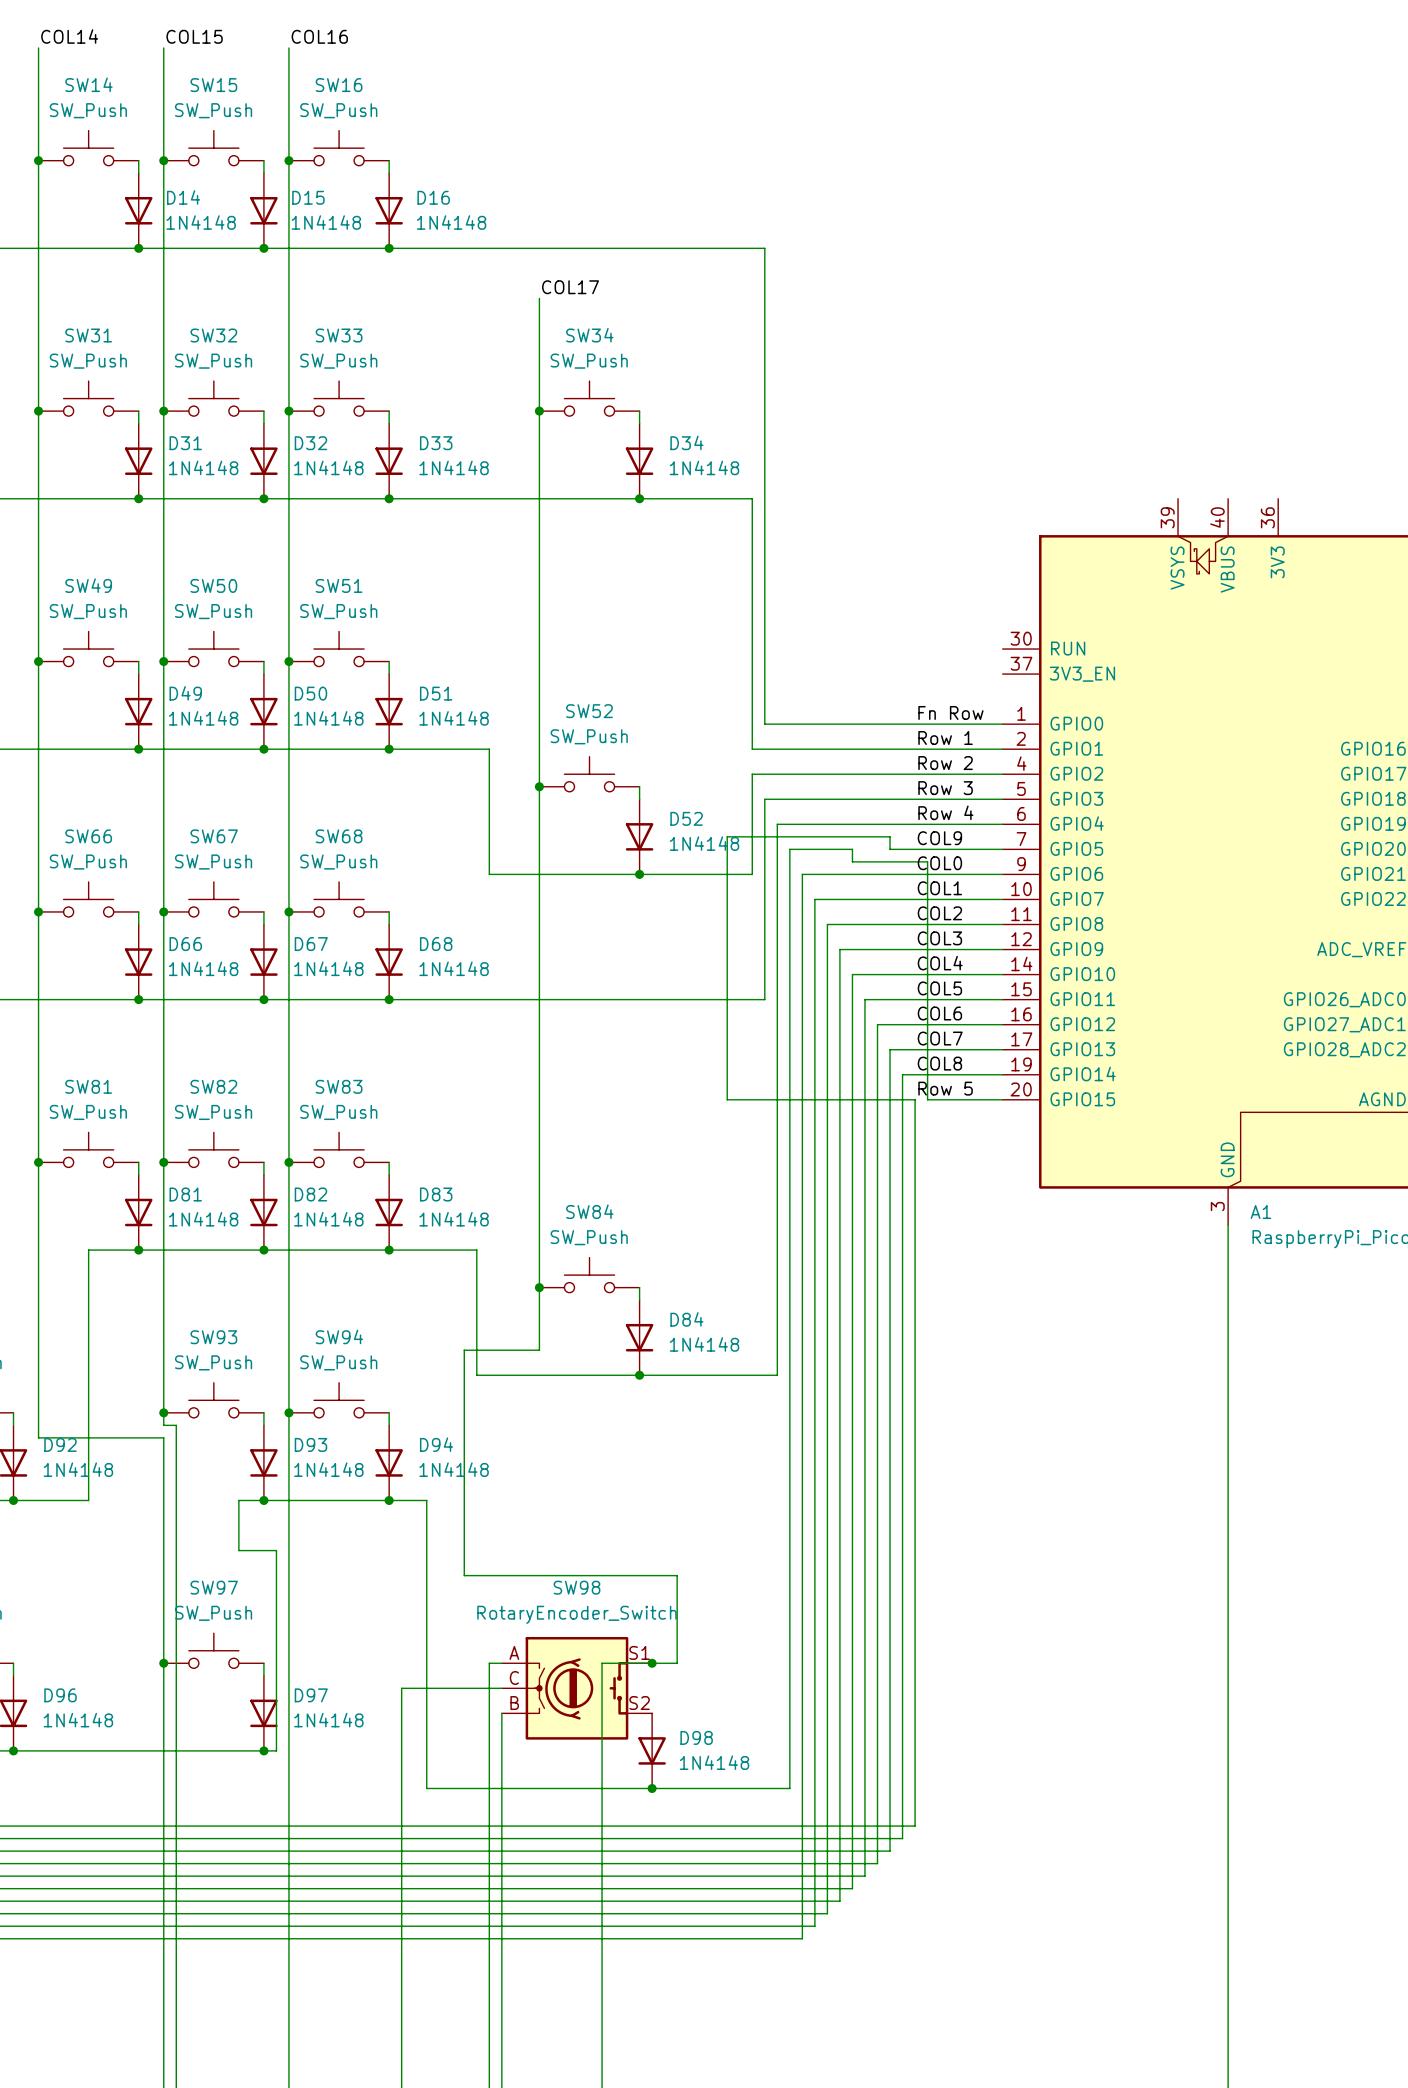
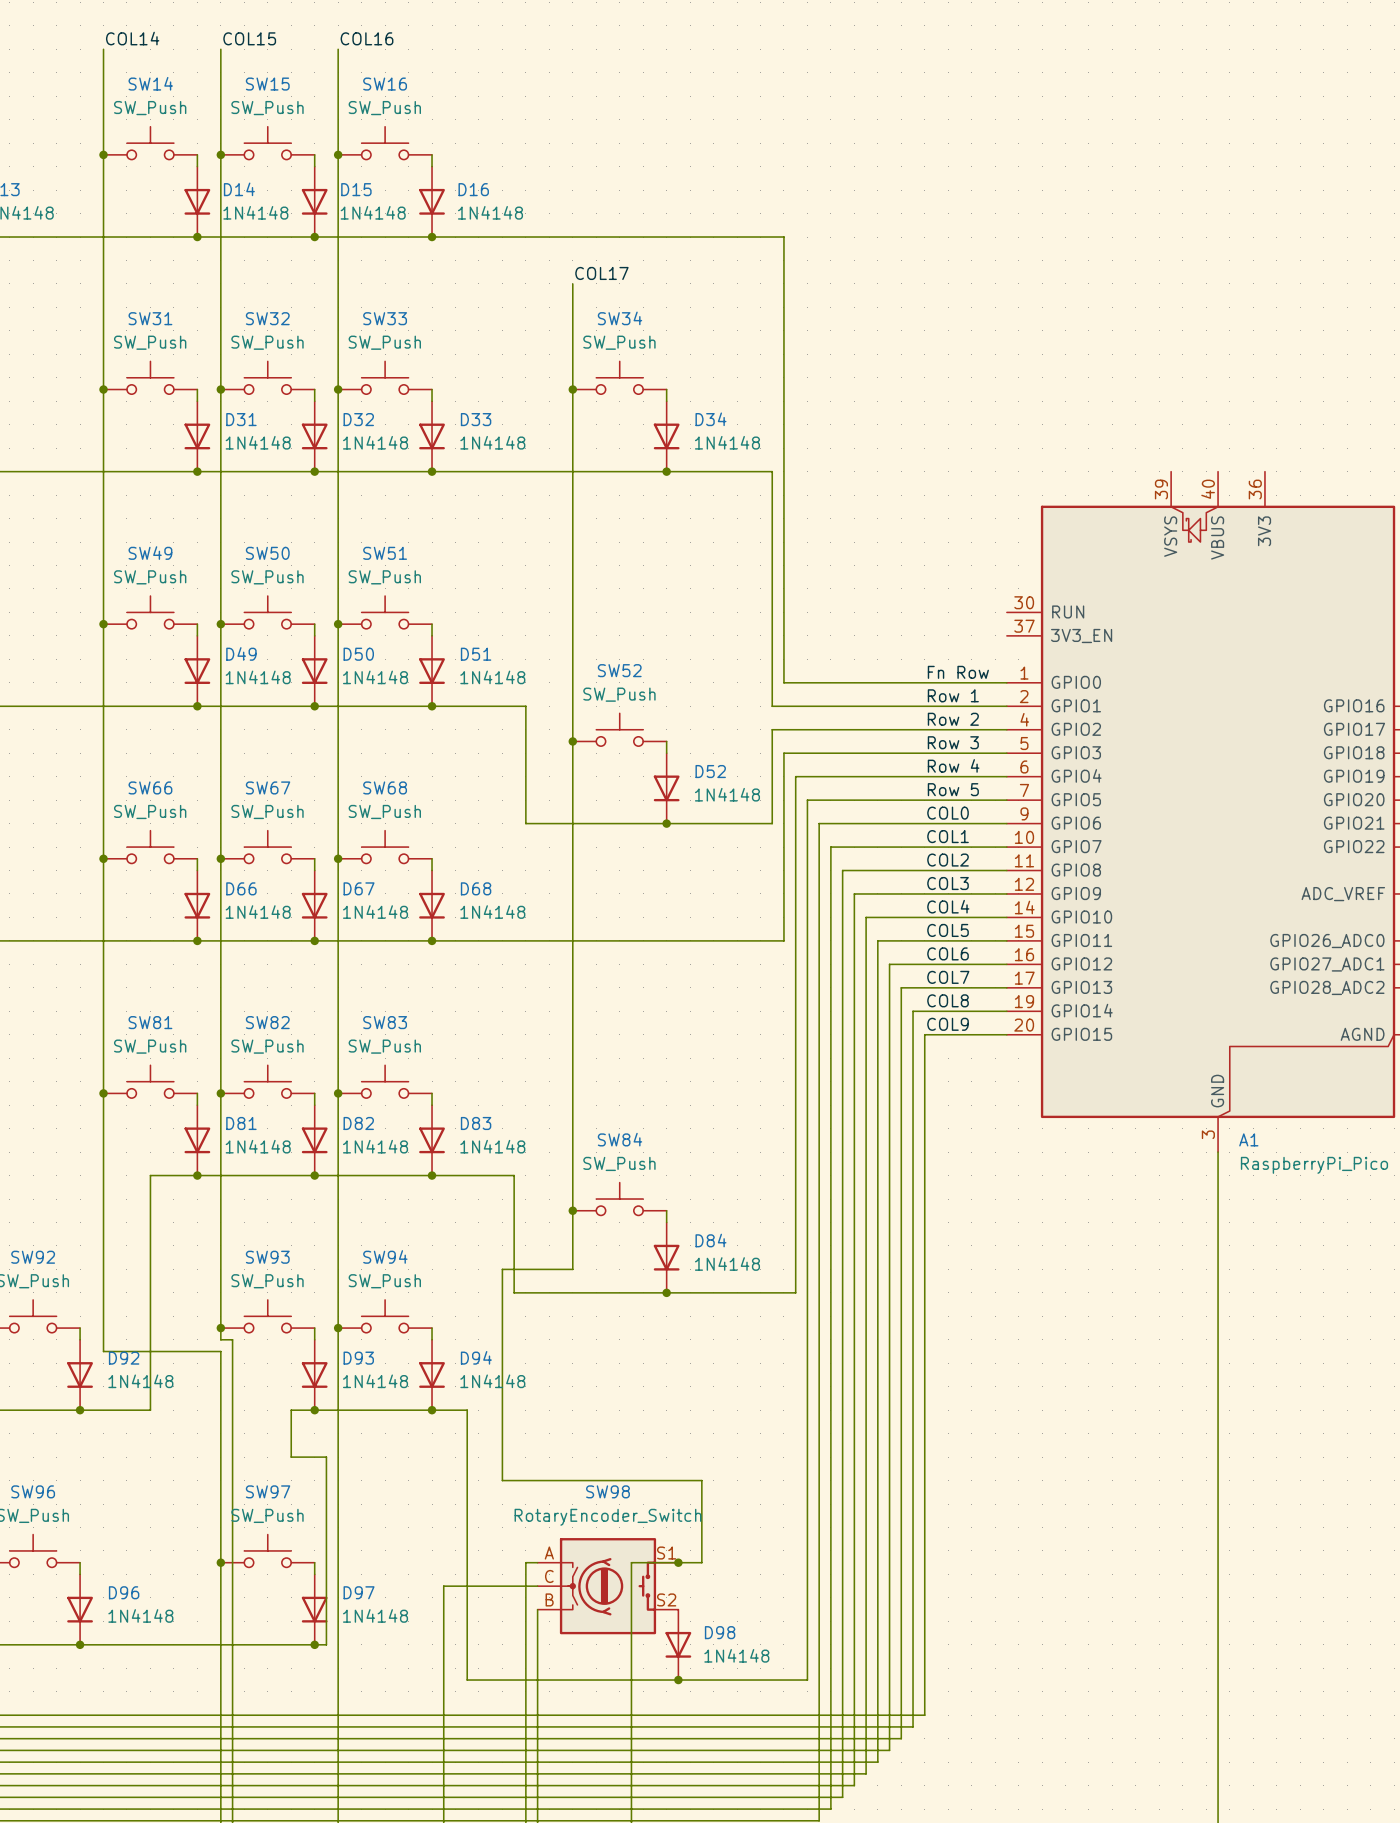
label: COL9 (939, 838) -> Row 5 (953, 789)
wire: (852, 849) (852, 861) (927, 861) (927, 1099) -> (866, 800) (901, 800)
wire: (890, 849) (890, 836) (727, 836) (727, 1099) (915, 1099) -> (936, 1034) (924, 1034)
label: Row 5 (945, 1088) -> COL9 (948, 1024)

